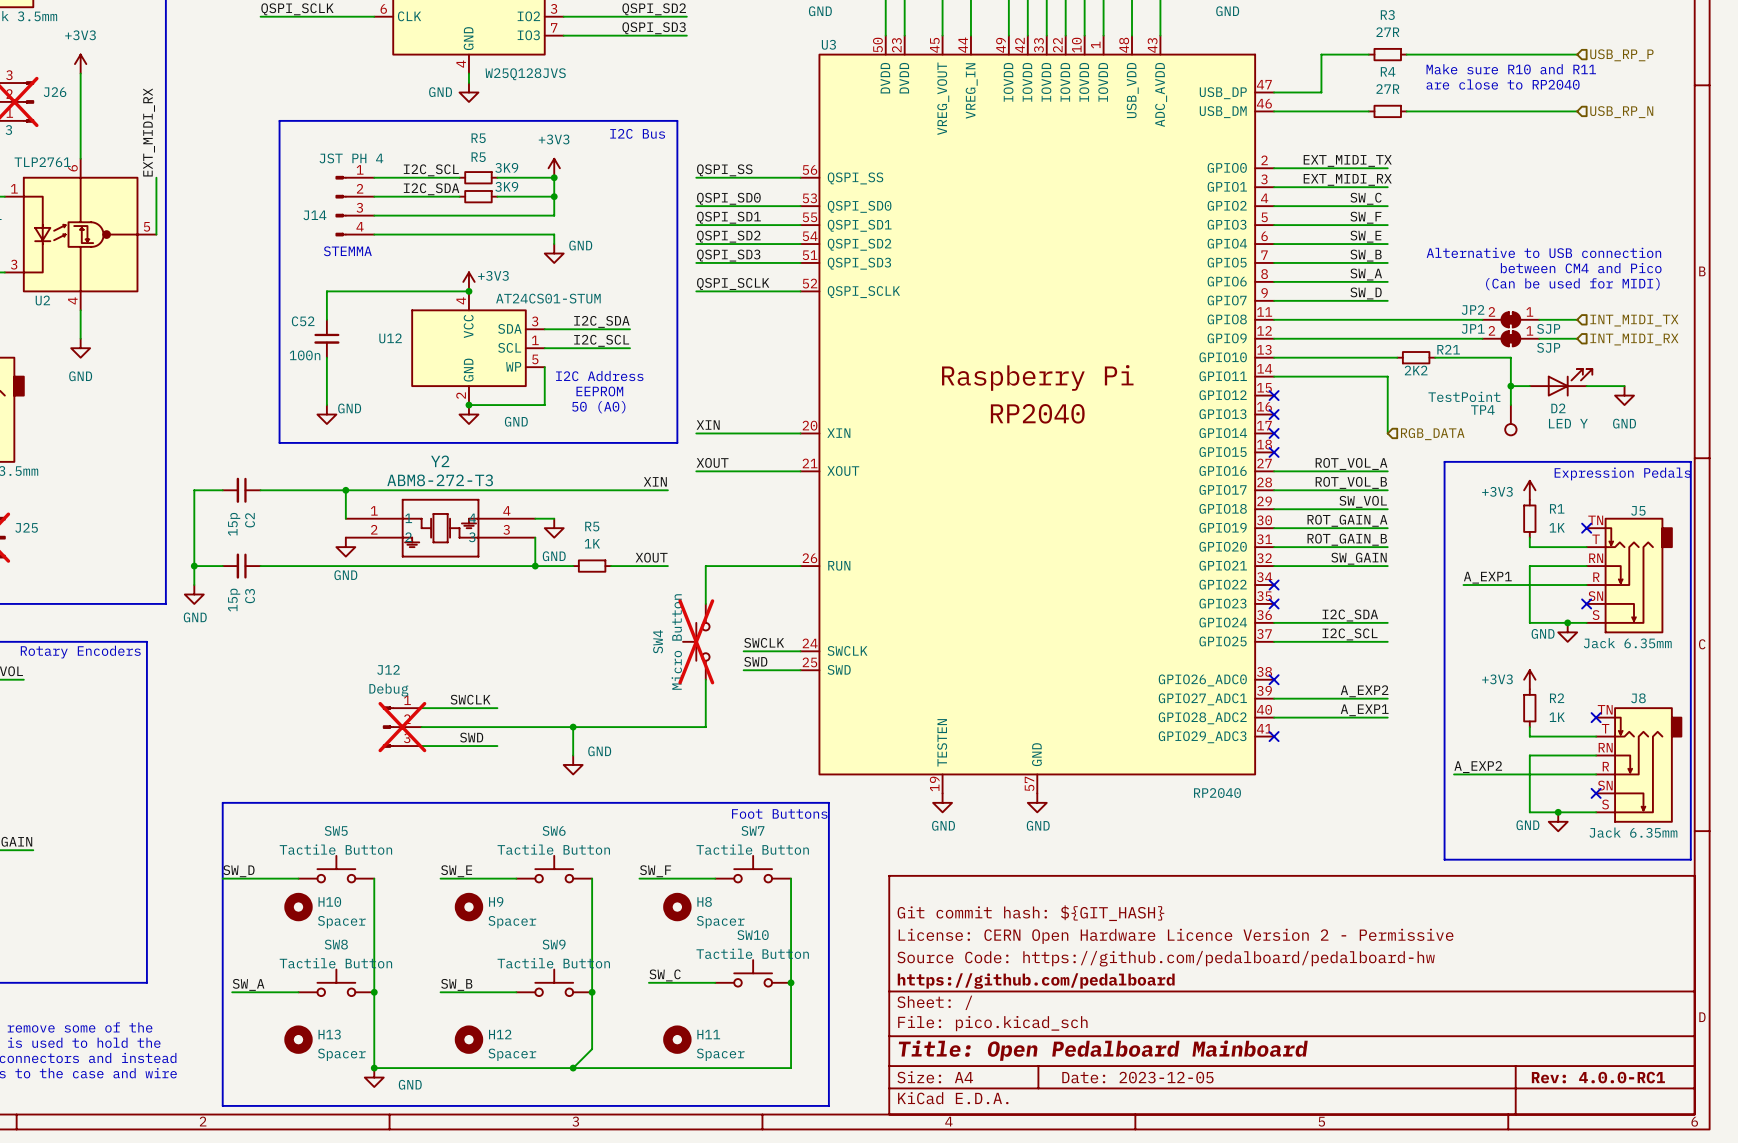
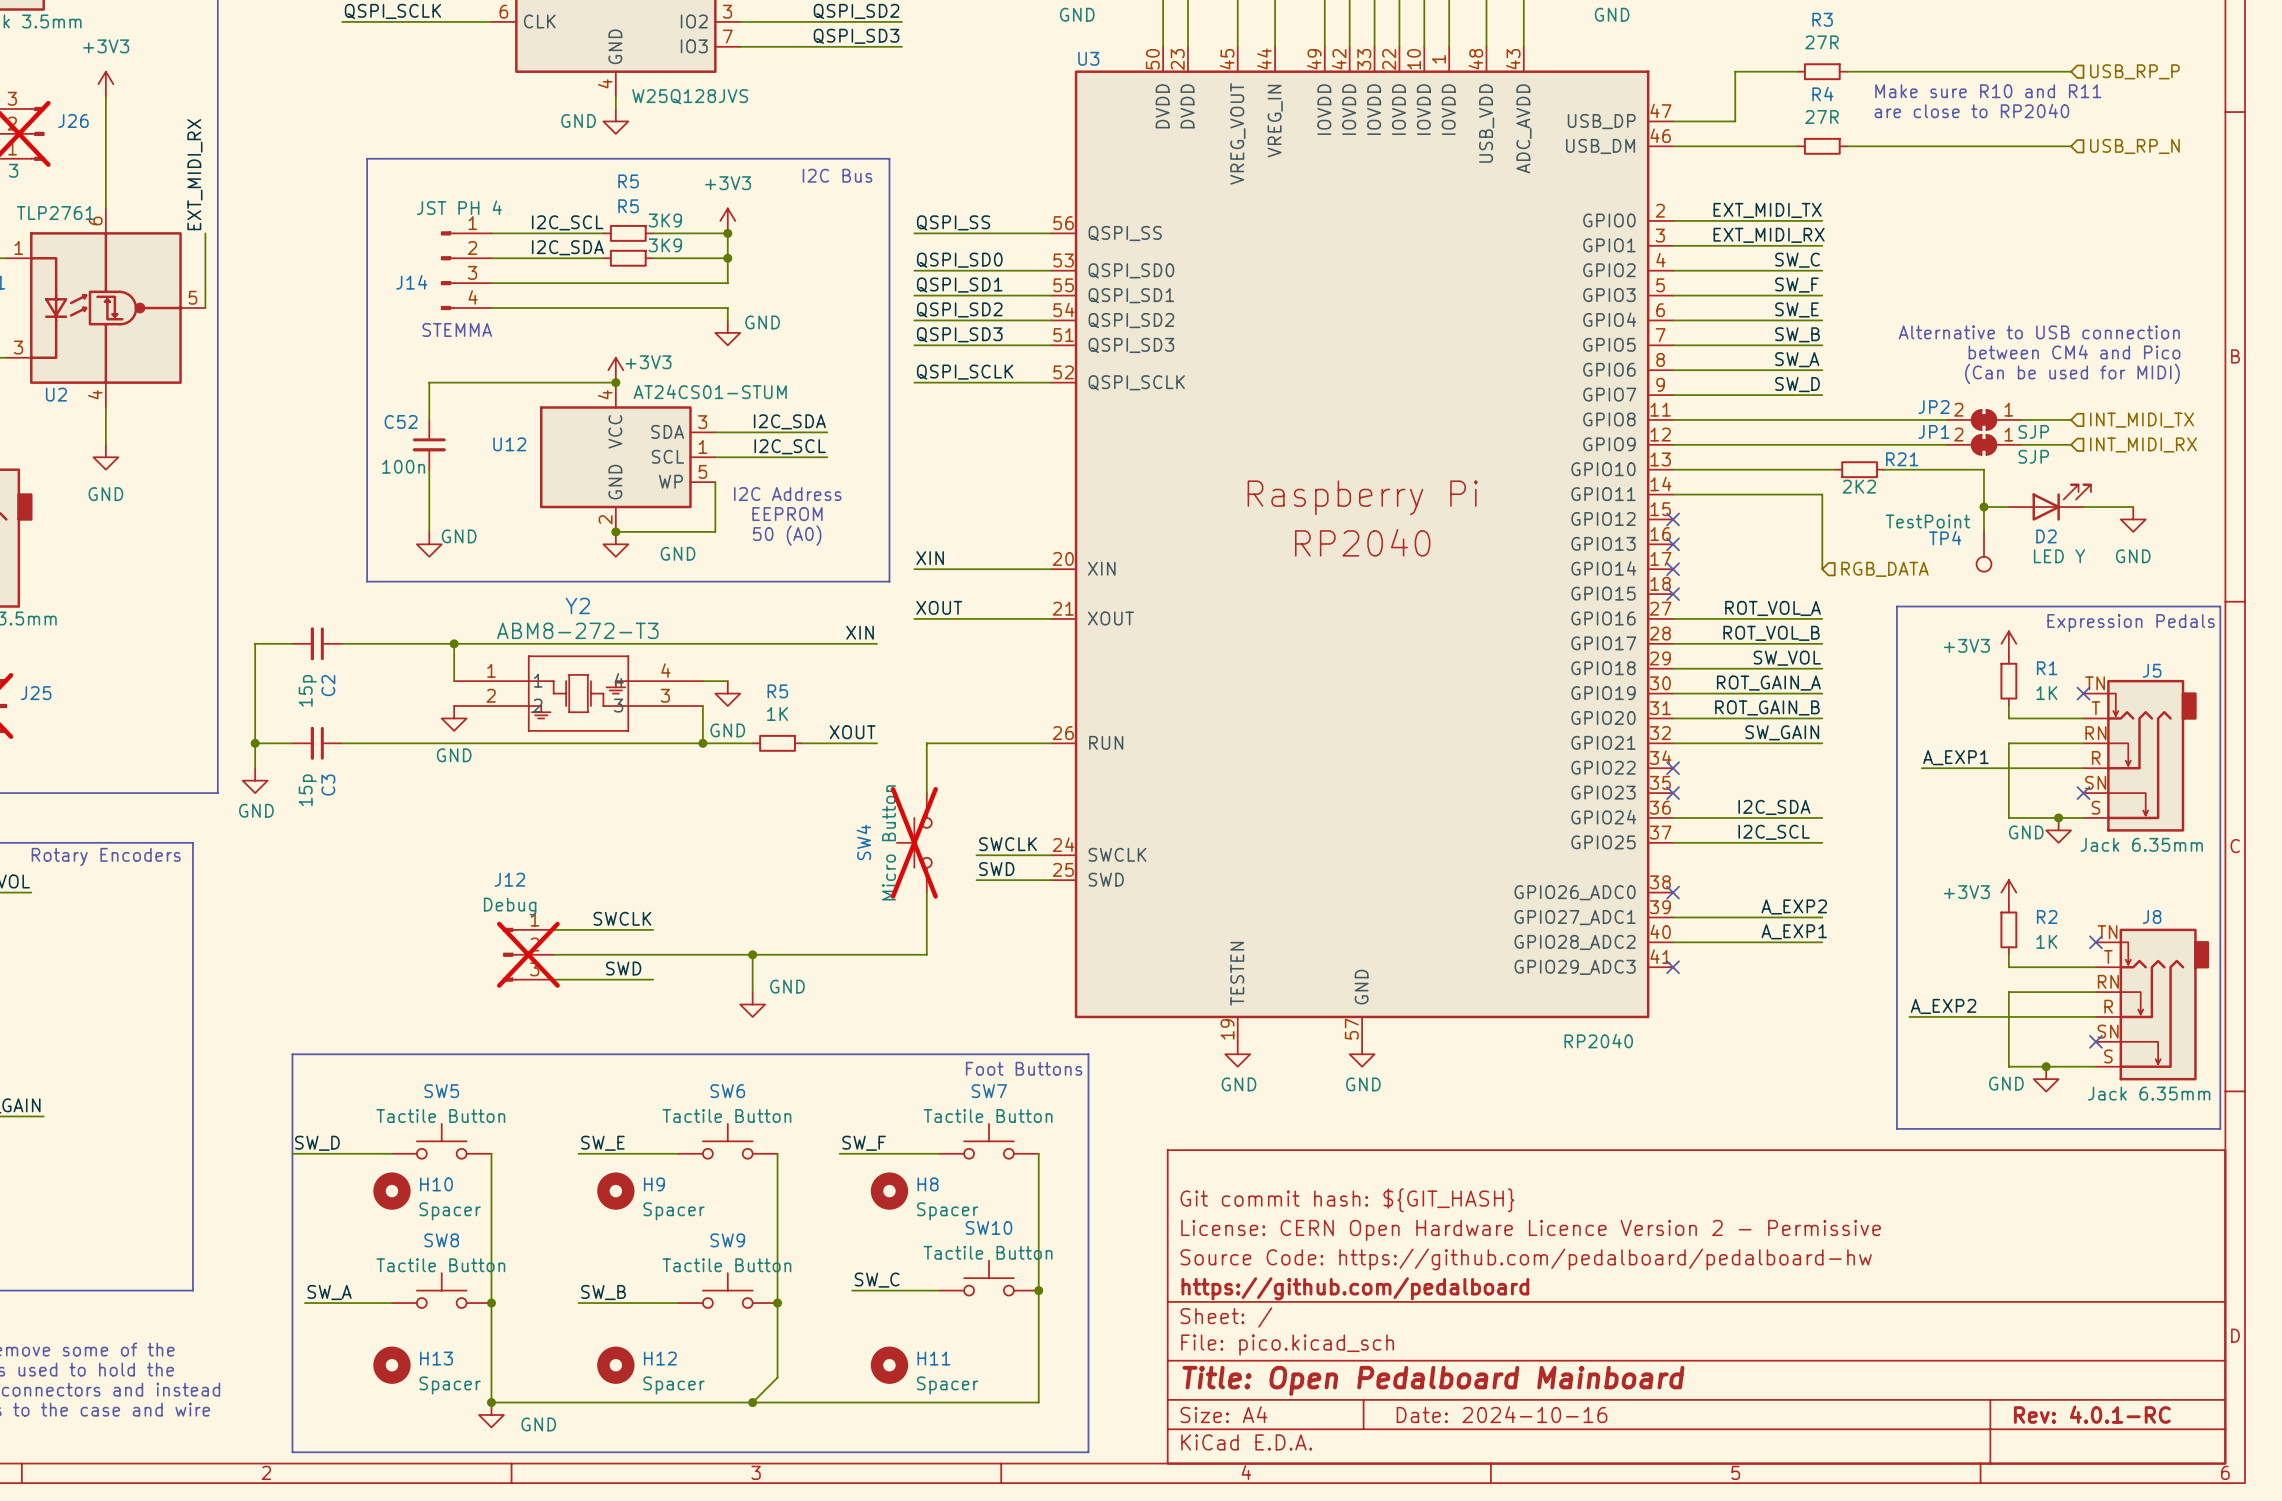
title block: Date: 2023-12-05 (1137, 1077) -> Date: 2024-10-16 (1502, 1414)
title block: Rev: 4.0.0-RC1 (1598, 1077) -> Rev: 4.0.1-RC (2092, 1414)

